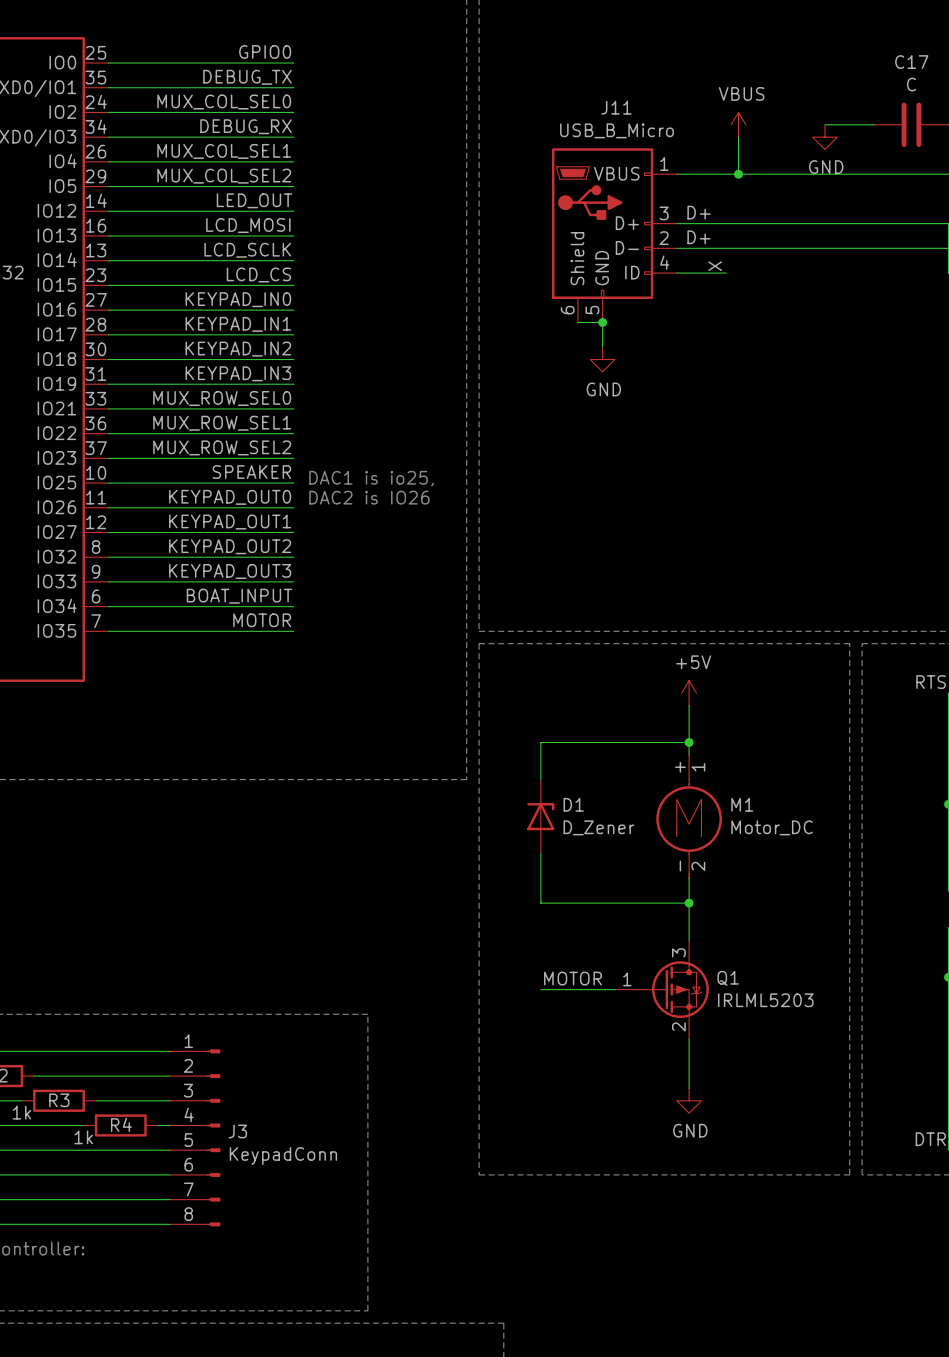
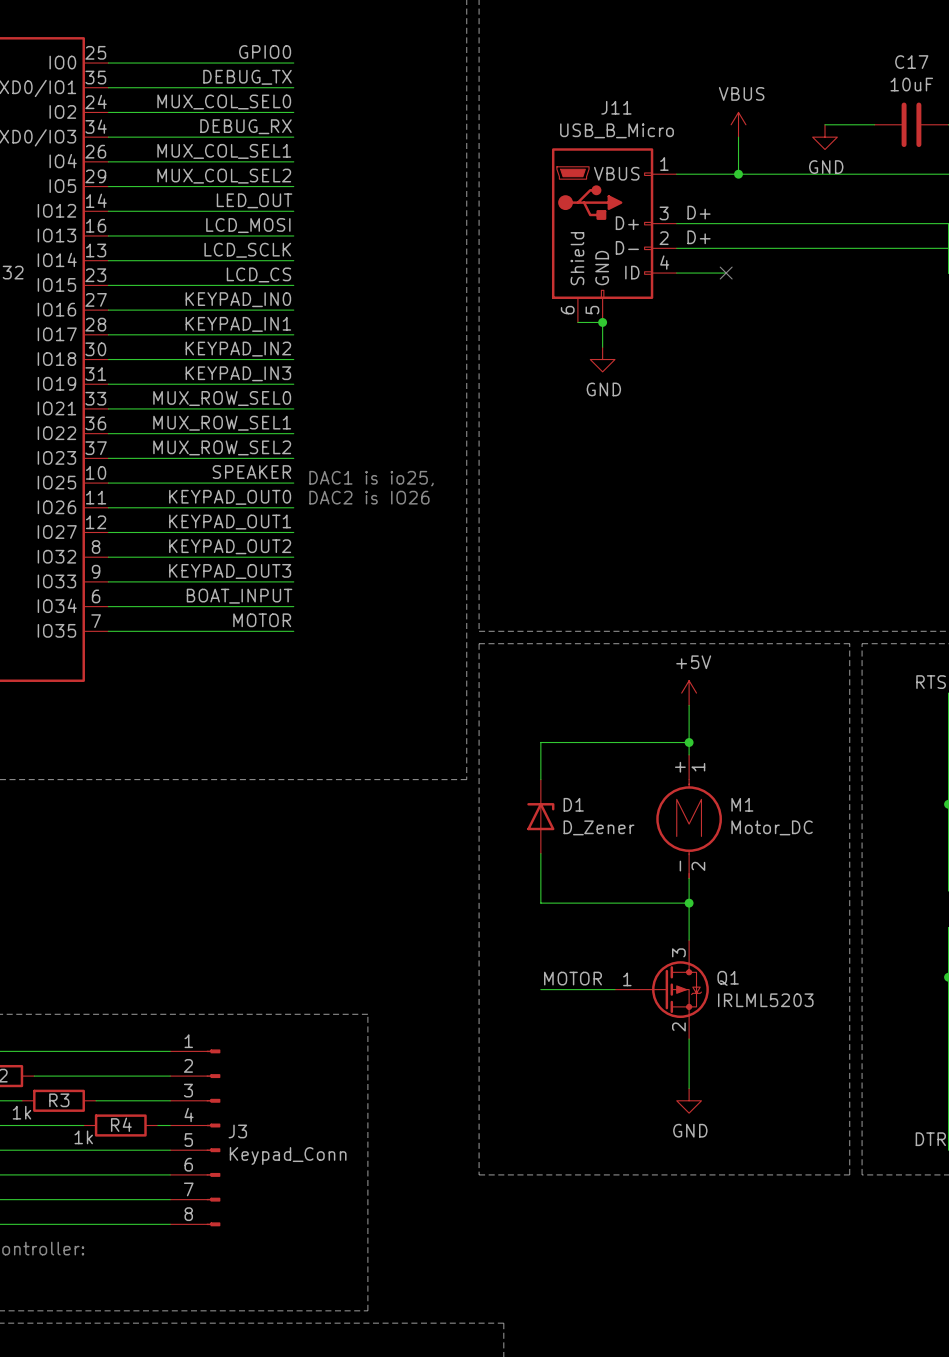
C17 value: C (911, 84) -> 10uF (911, 84)
label: X (715, 266) -> none
no-connect mark: none -> (726, 273)
J3 value: KeypadConn (283, 1156) -> Keypad_Conn (288, 1156)

